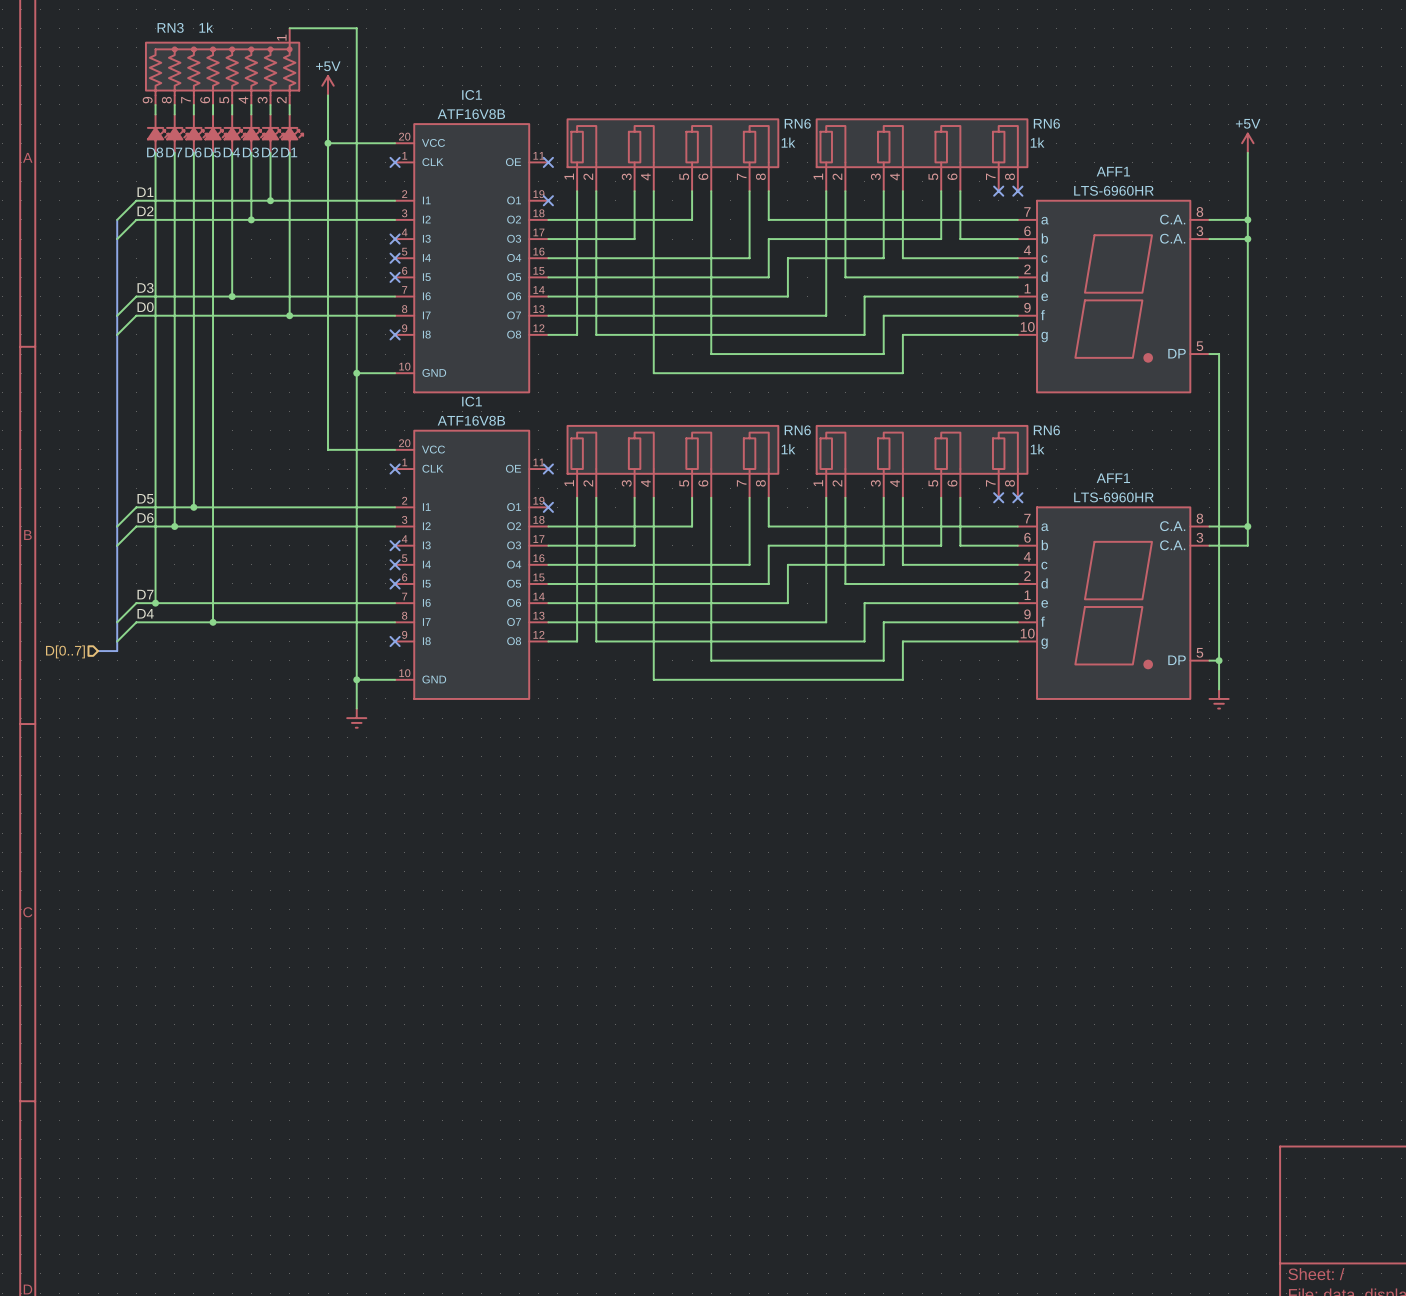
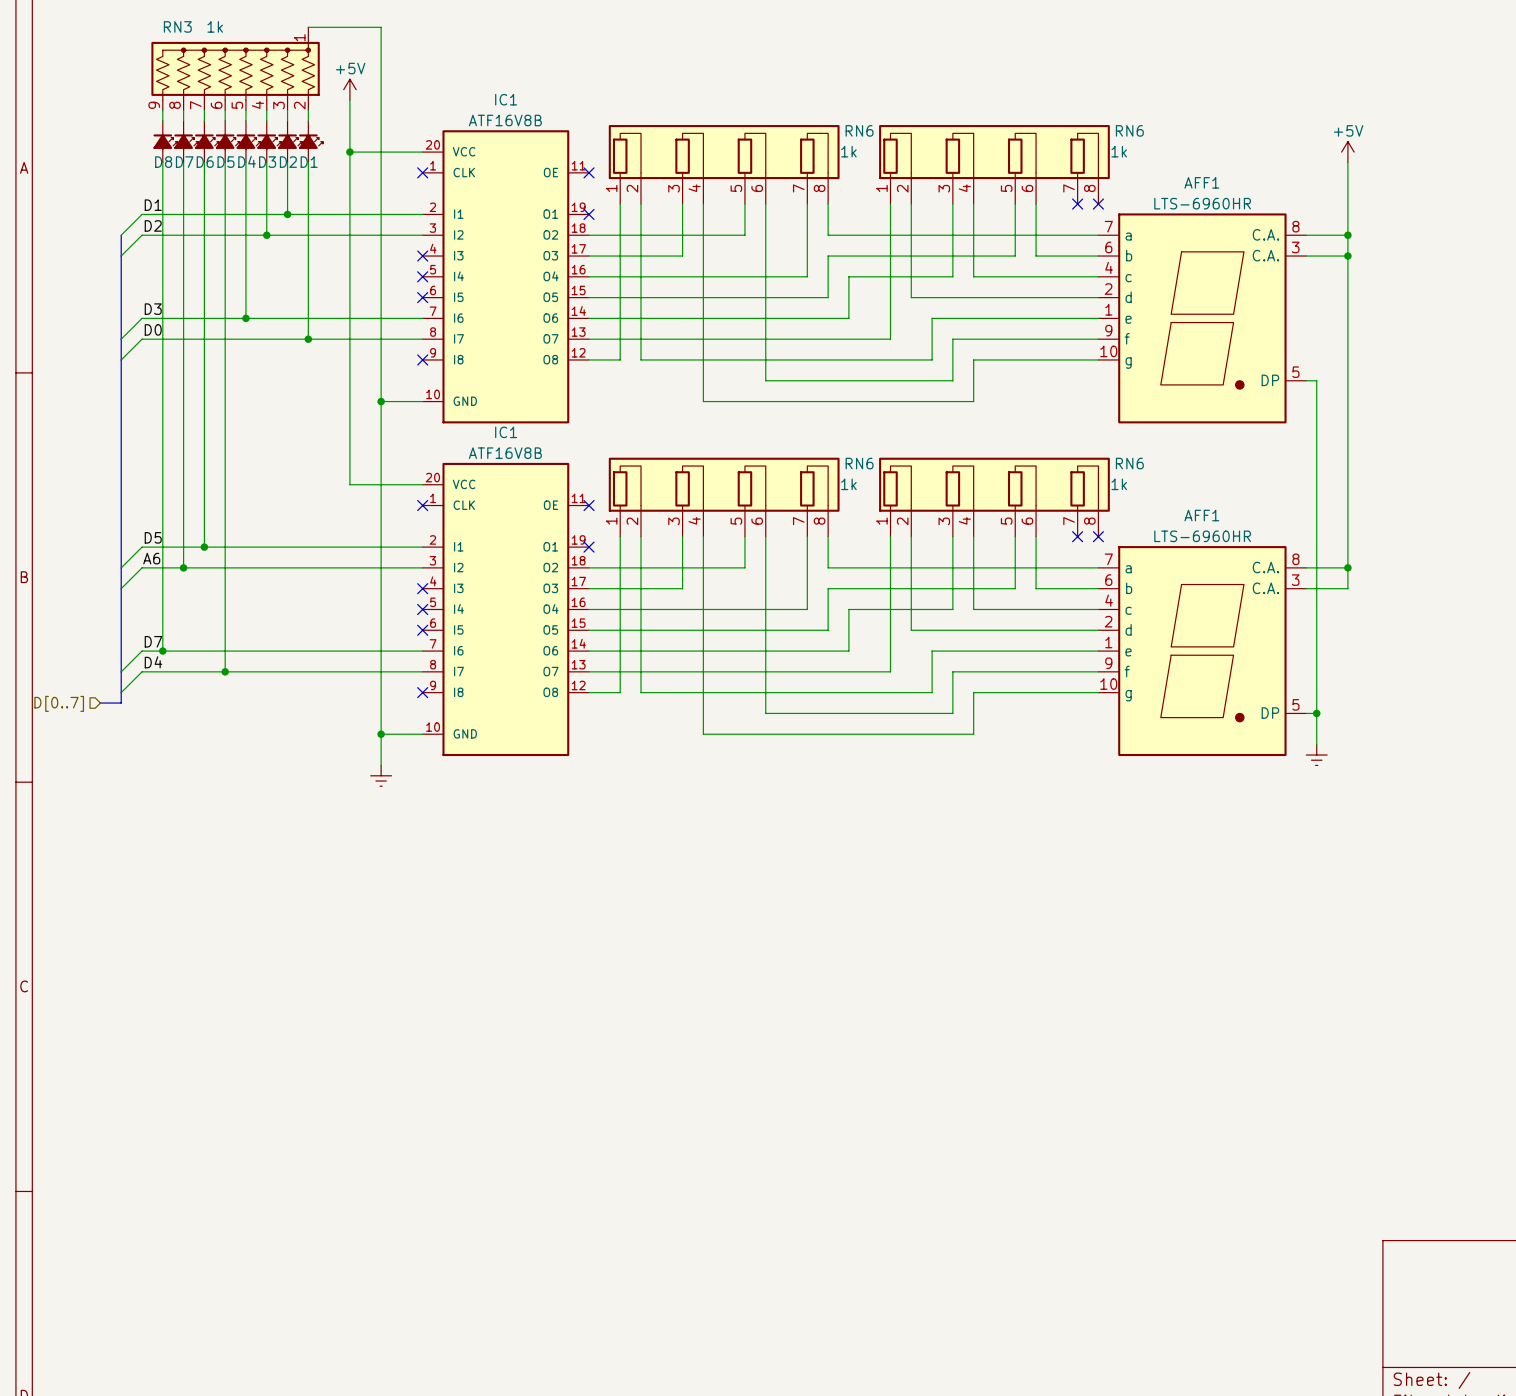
label: D6 (145, 517) -> A6 (151, 558)

